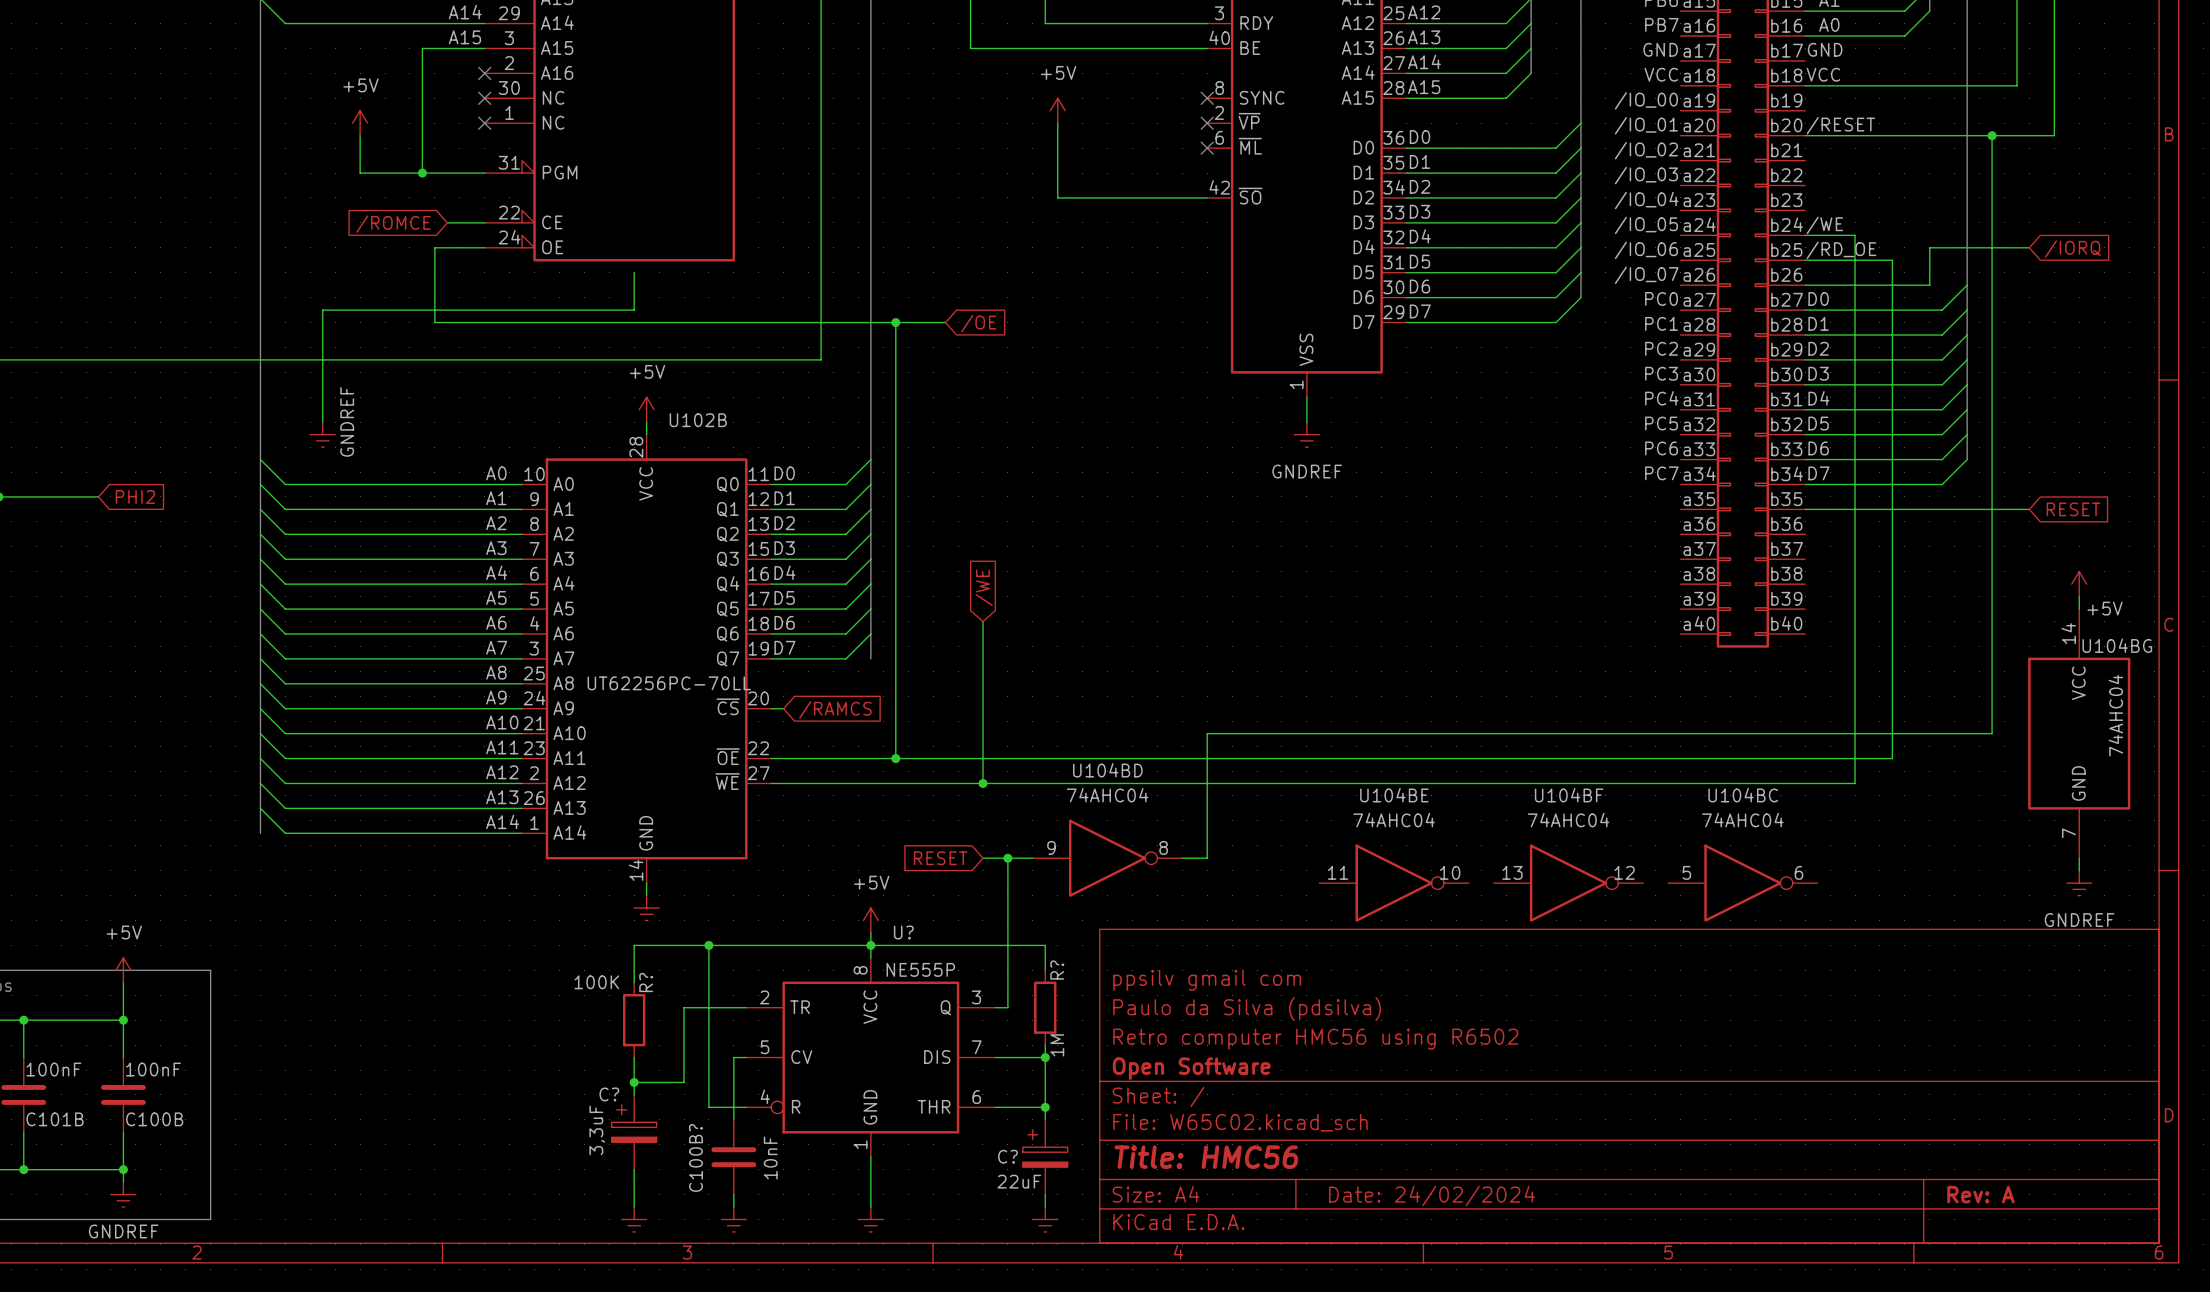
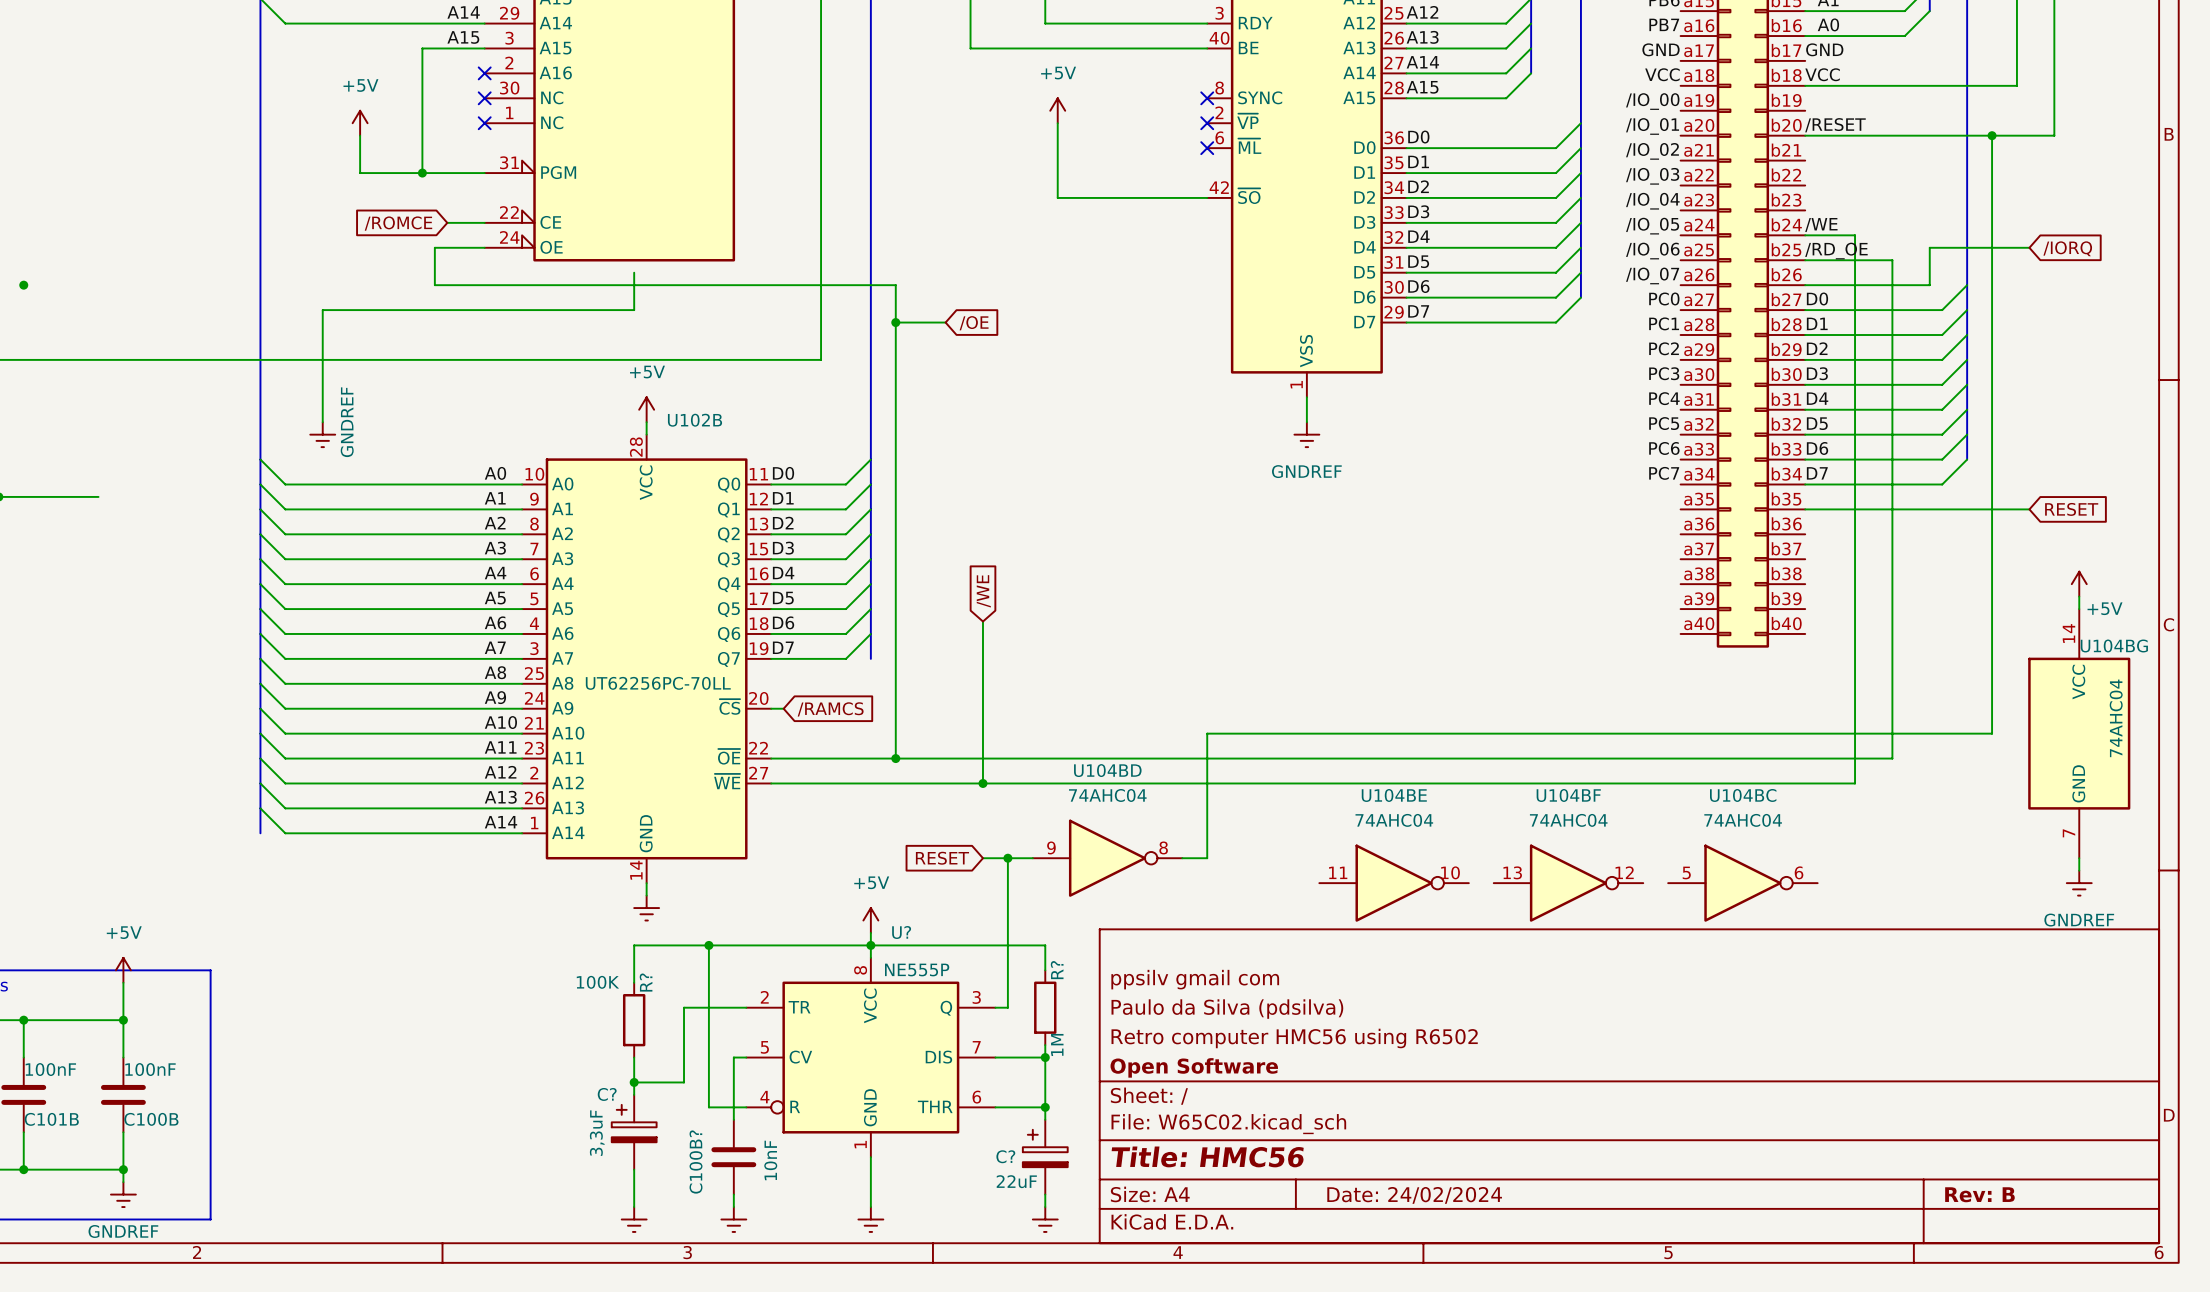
junction: none -> (23, 285)
wire: (434, 285) (434, 322) (895, 322) -> (434, 285) (895, 285) (895, 322)
global label: PHI2 (135, 496) -> none
title block: Rev: A (1980, 1194) -> Rev: B (1979, 1194)

